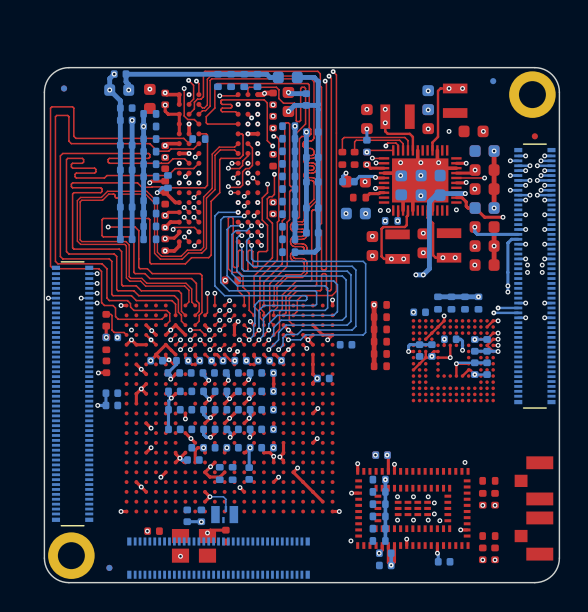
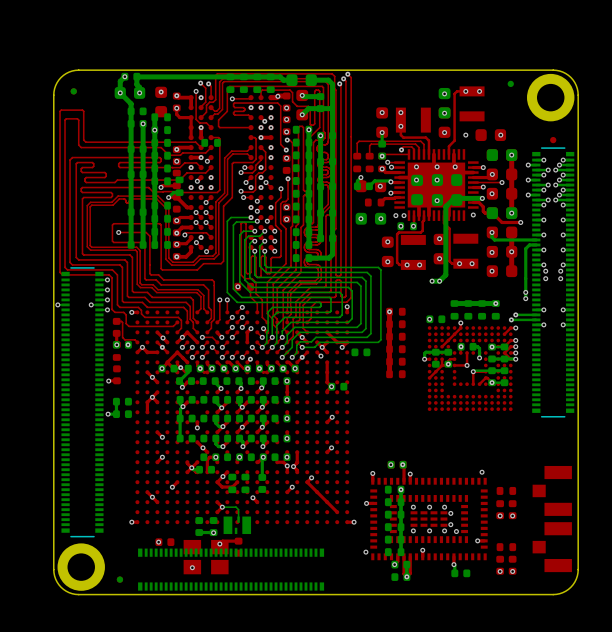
via: (131, 330) -> none

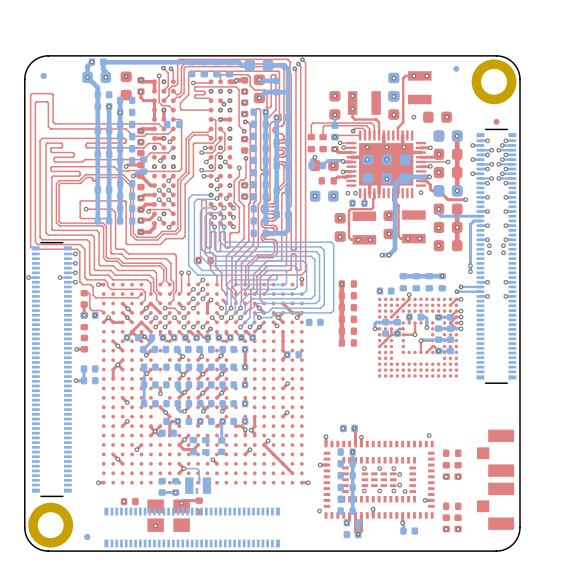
via: (263, 328) -> none

